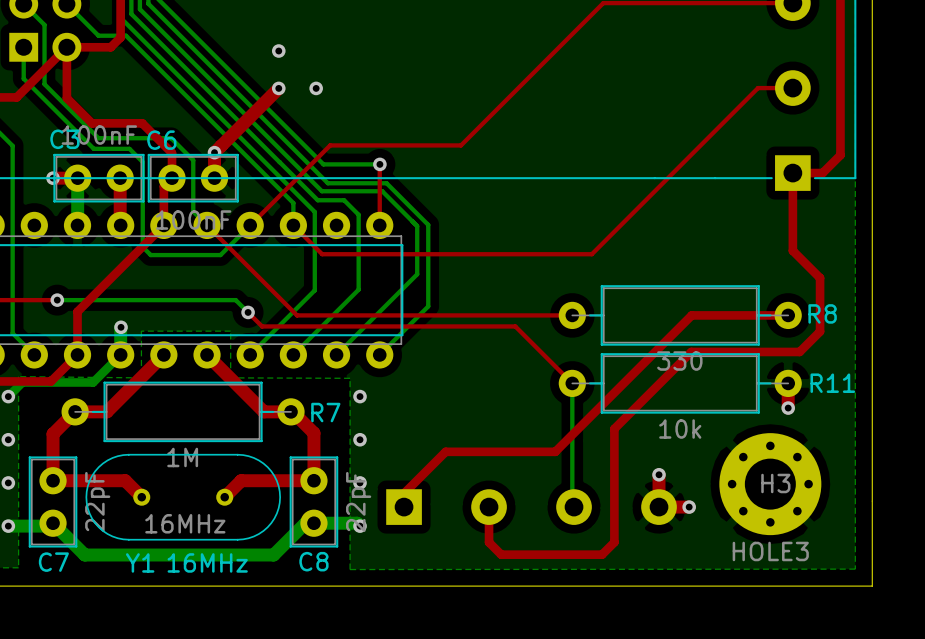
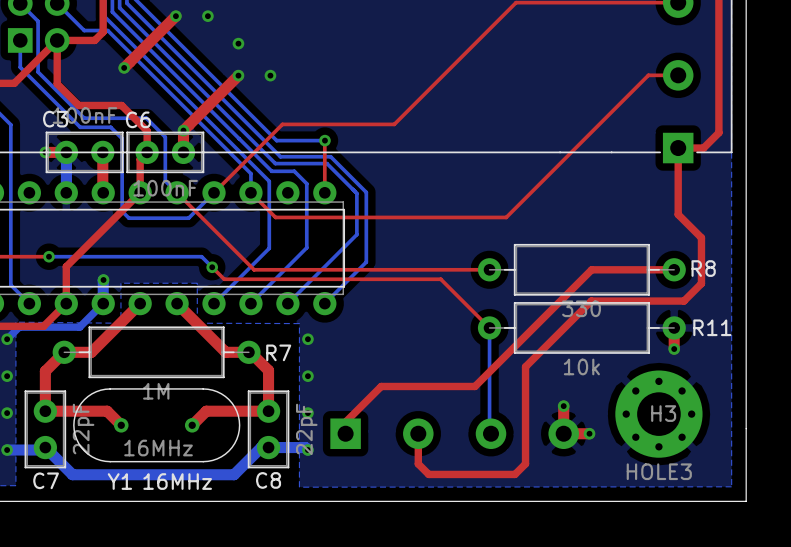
top track: none -> (175, 16) (124, 67)
via: none -> (175, 16)
via: none -> (207, 16)
via: none -> (124, 67)

